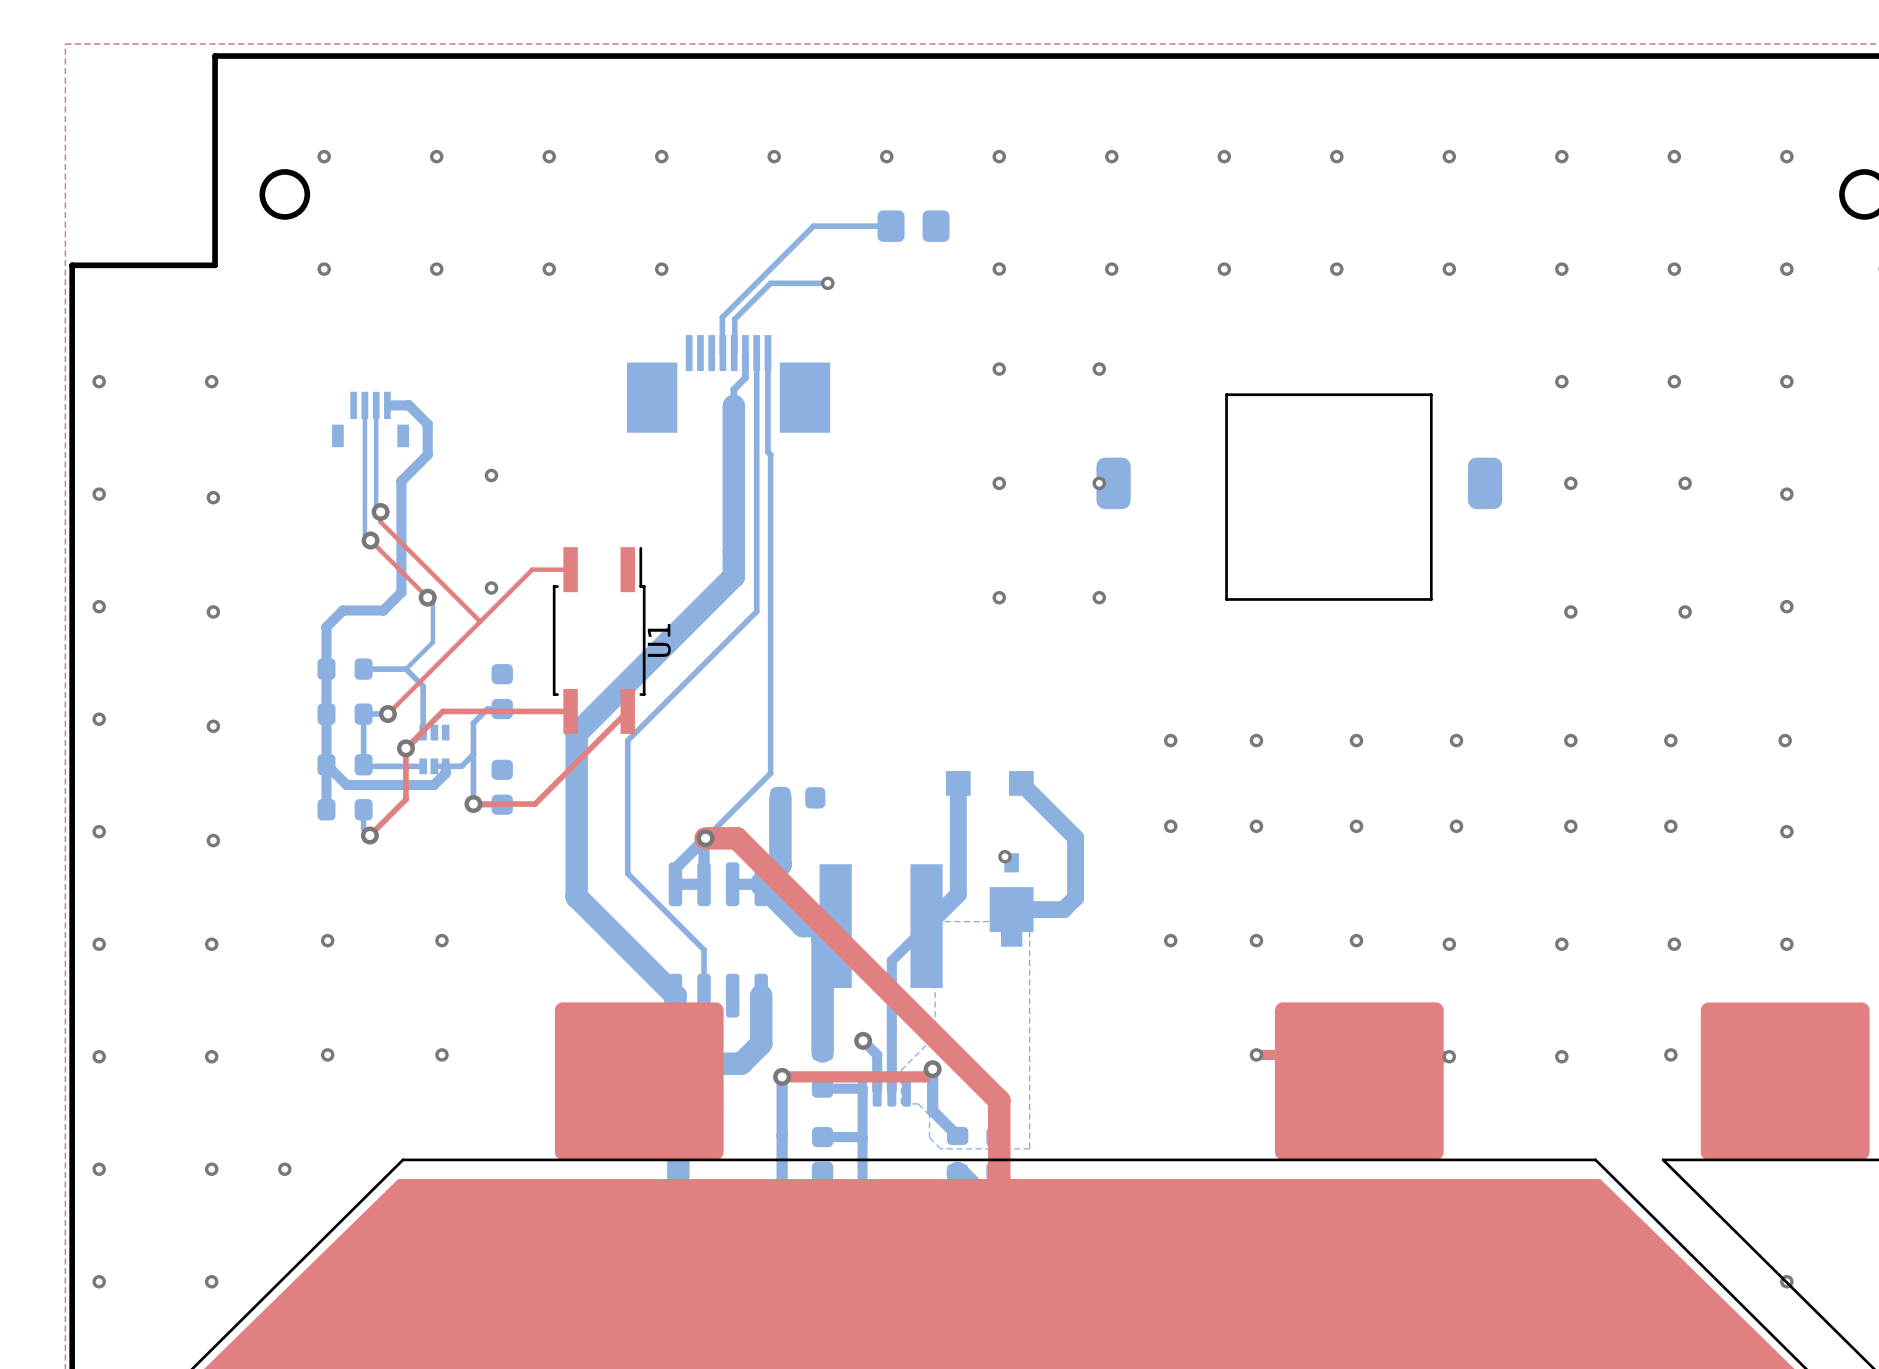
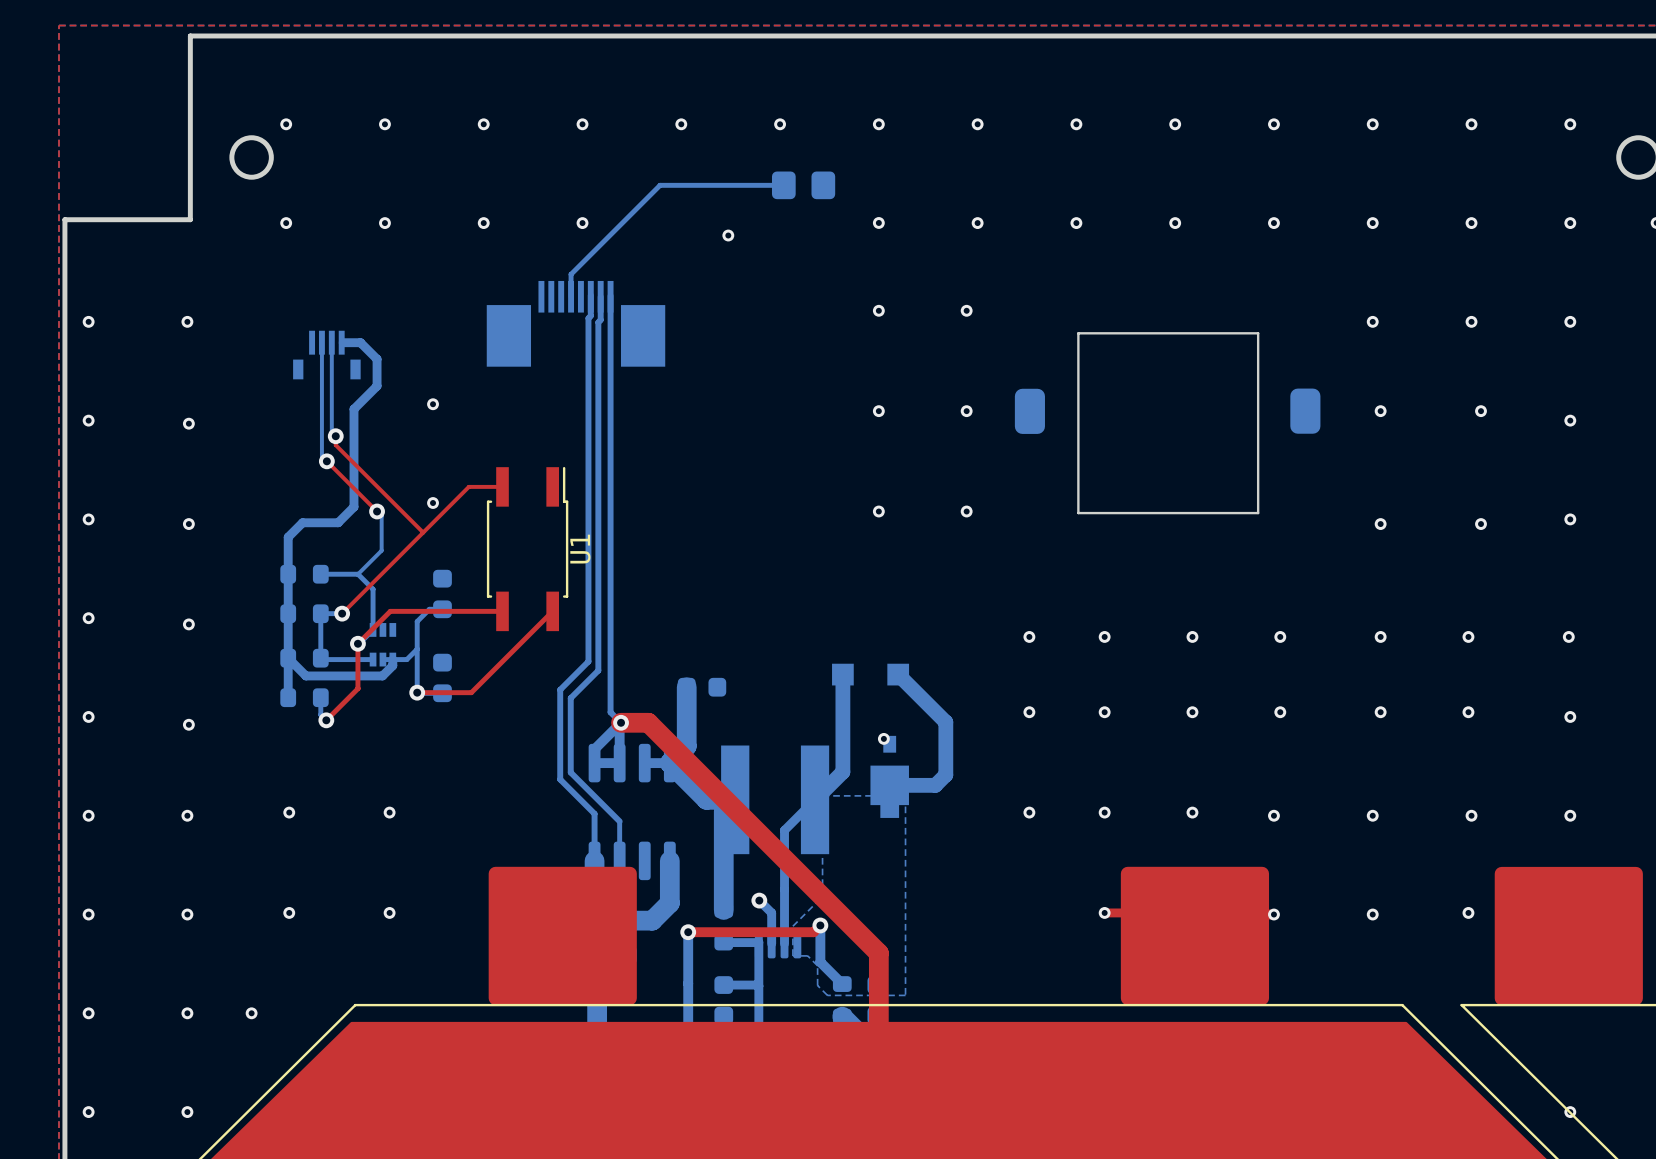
bottom track: (813, 226) (722, 317) (722, 353) -> (715, 185) (660, 185) (571, 274) (571, 296)
bottom track: (827, 283) (770, 283) (734, 319) (734, 353) -> none
bottom track: (745, 353) (745, 377) (733, 389) (733, 576) (576, 733) (576, 896) (675, 995) -> (590, 295) (590, 315) (588, 318) (588, 661) (560, 689) (560, 779) (594, 813) (594, 860)
bottom track: (756, 353) (756, 611) (627, 740) (627, 873) (704, 950) -> (600, 296) (600, 319) (598, 322) (598, 670) (570, 698) (570, 772) (619, 821)
bottom track: (767, 353) (767, 452) (770, 454) (770, 773) (705, 838) -> (610, 295) (610, 712) (621, 722)
part position: (728, 383) -> (576, 323)
part position: (1113, 483) -> (1029, 411)

